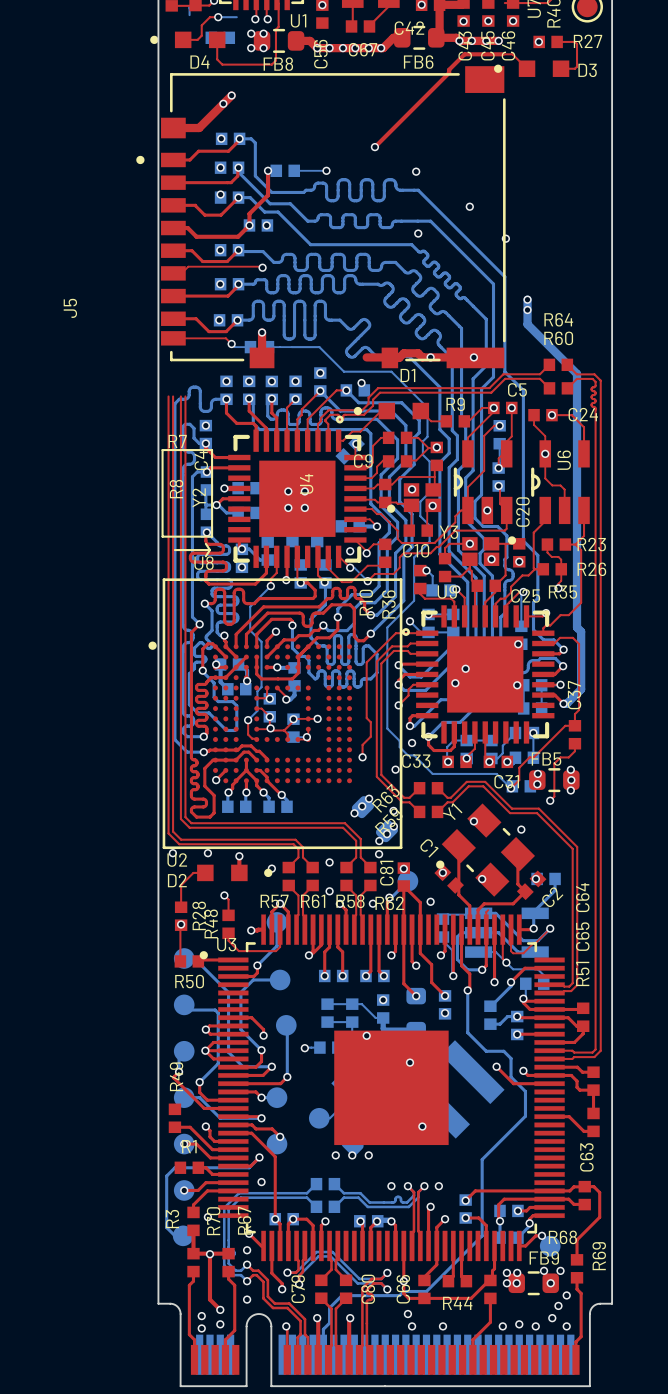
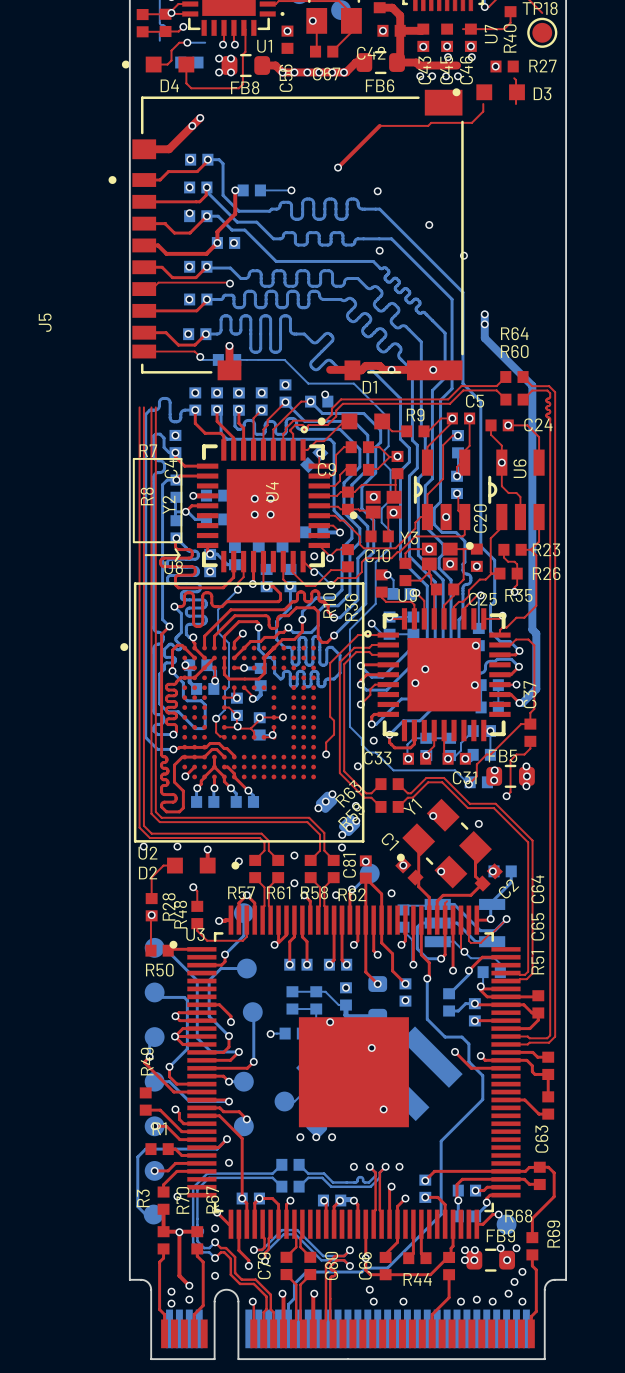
via: none -> (448, 57)
via: none -> (471, 57)
via: (459, 40) -> none
via: (471, 40) -> none
via: (486, 40) -> none
via: (498, 40) -> none
top track: (557, 41) (574, 41) (577, 43) (577, 66) (574, 68) (561, 68) -> none
via: none -> (420, 76)
via: none -> (432, 76)
via: none -> (446, 76)
via: none -> (457, 76)
top track: none -> (514, 78) (516, 80) (516, 104)
top track: (527, 68) (512, 54) (464, 54) (418, 103) -> (483, 104) (483, 111) (471, 122) (431, 122) (428, 125) (379, 125)

